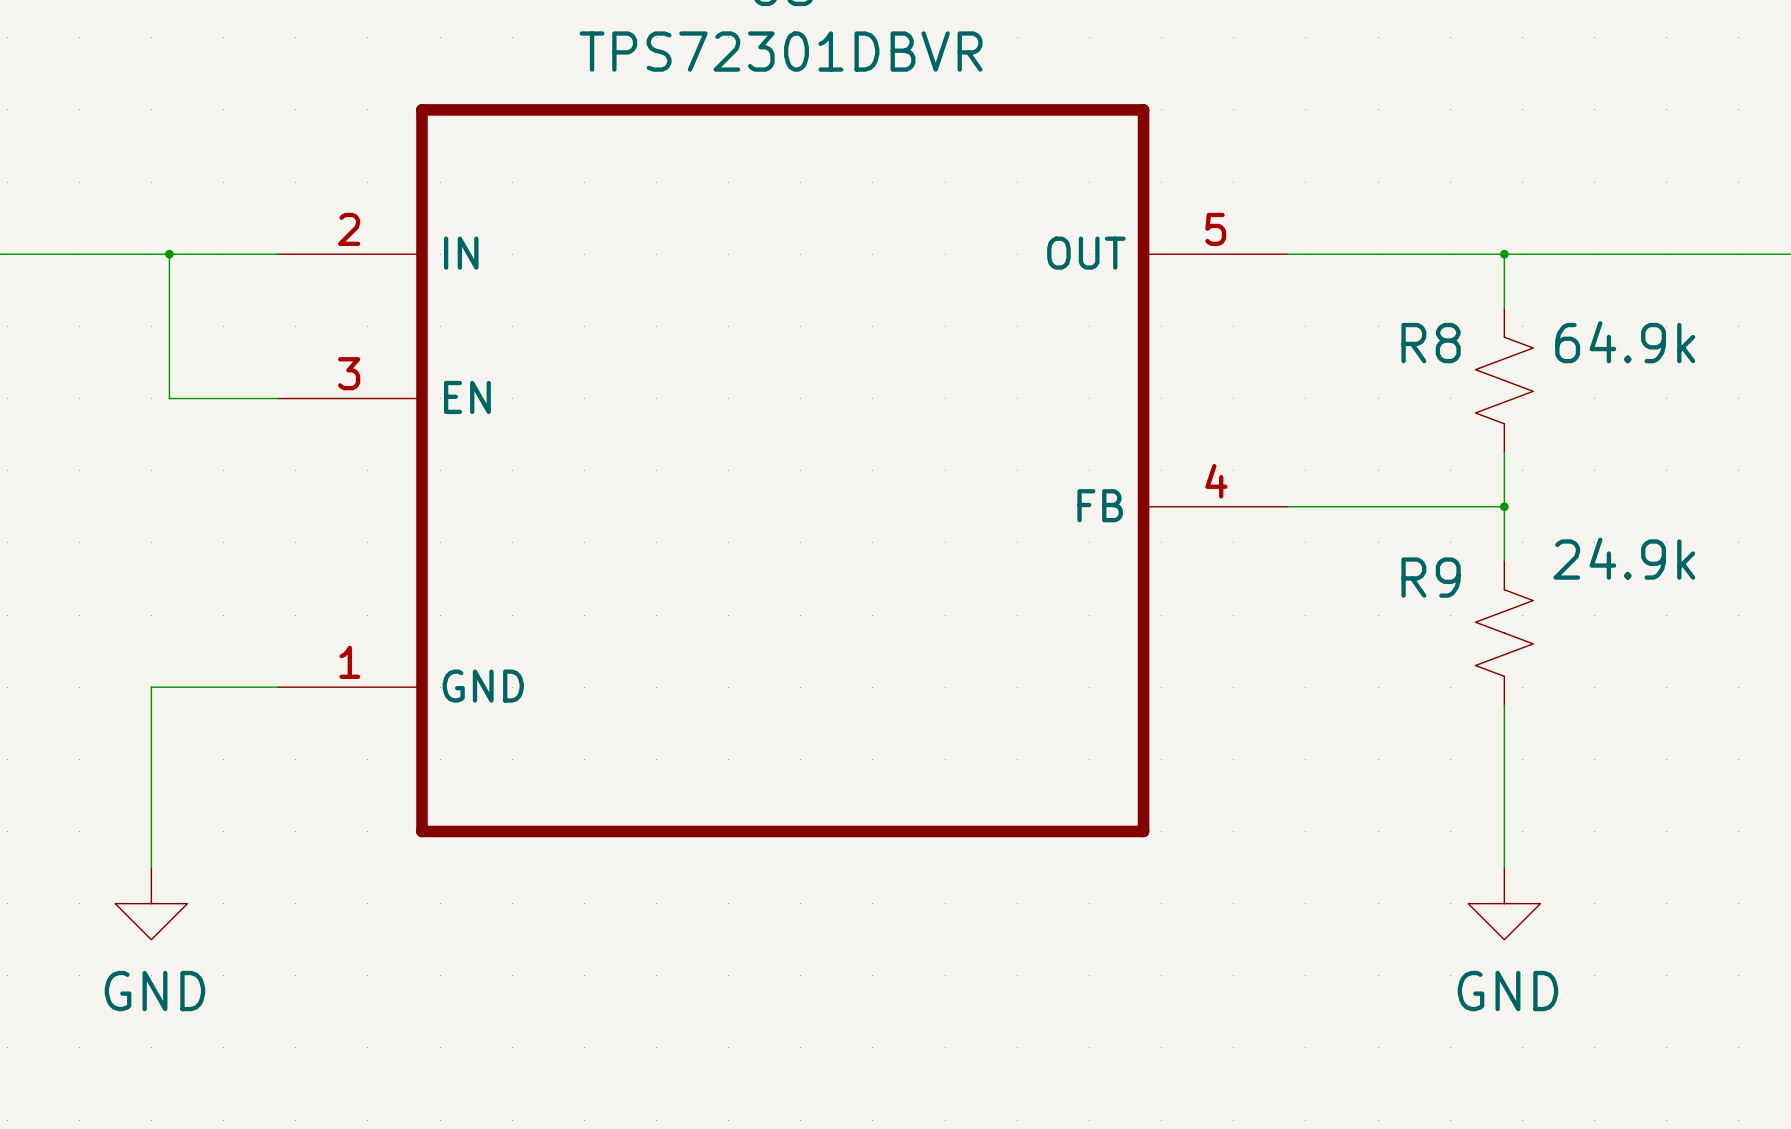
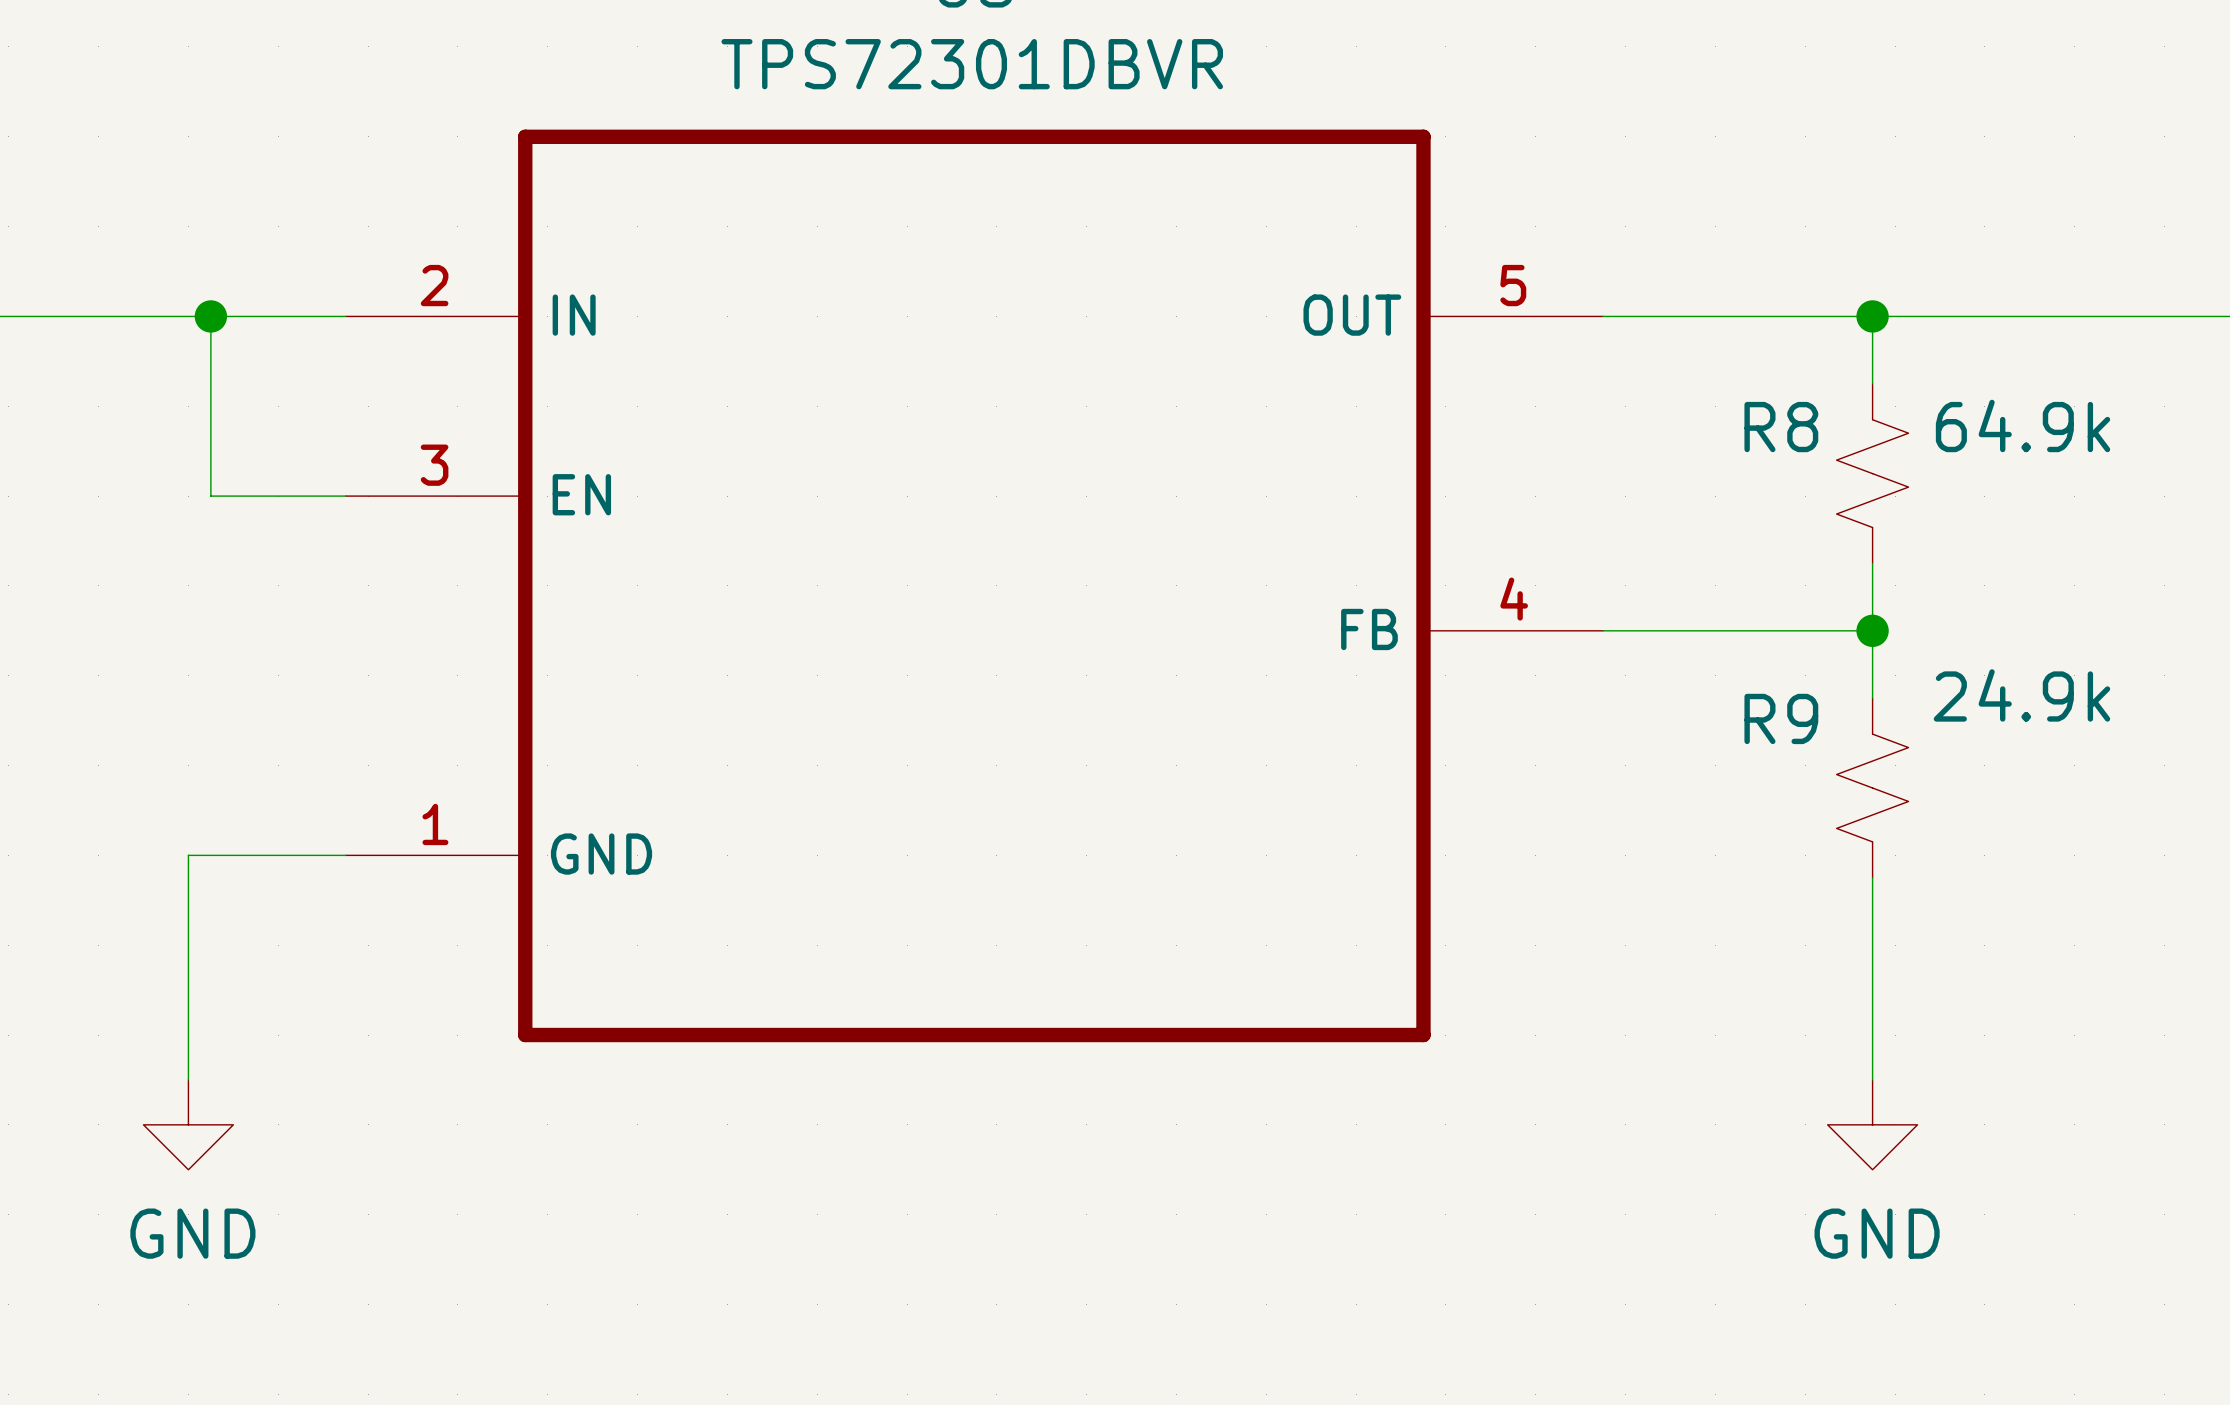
junction size: [165, 249, 174, 259] -> [194, 300, 228, 333]
junction size: [1500, 249, 1509, 259] -> [1856, 300, 1889, 333]
junction size: [1500, 502, 1509, 512] -> [1856, 614, 1889, 647]

